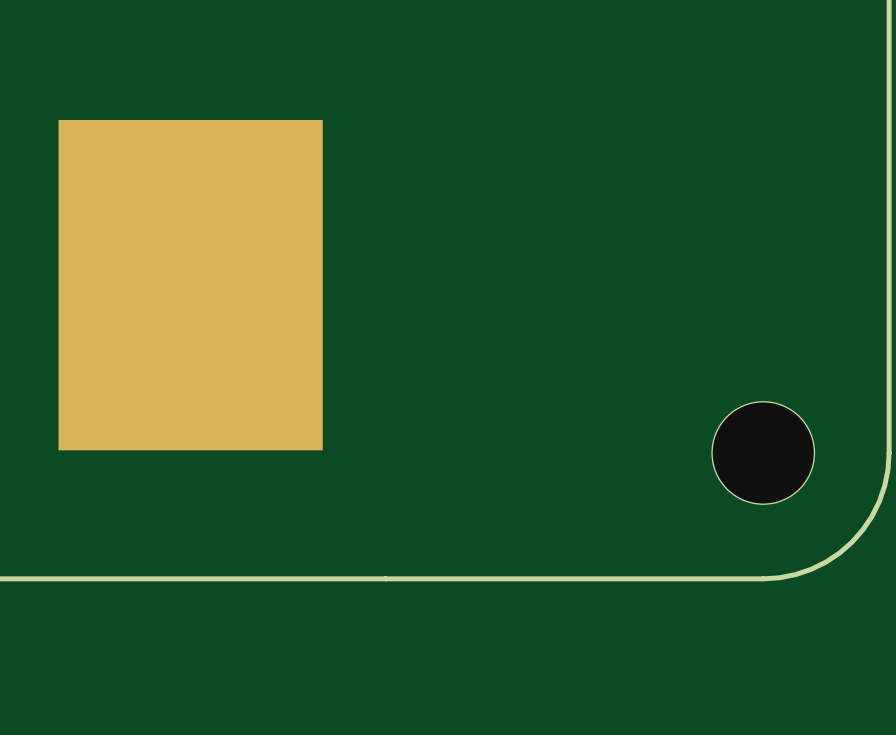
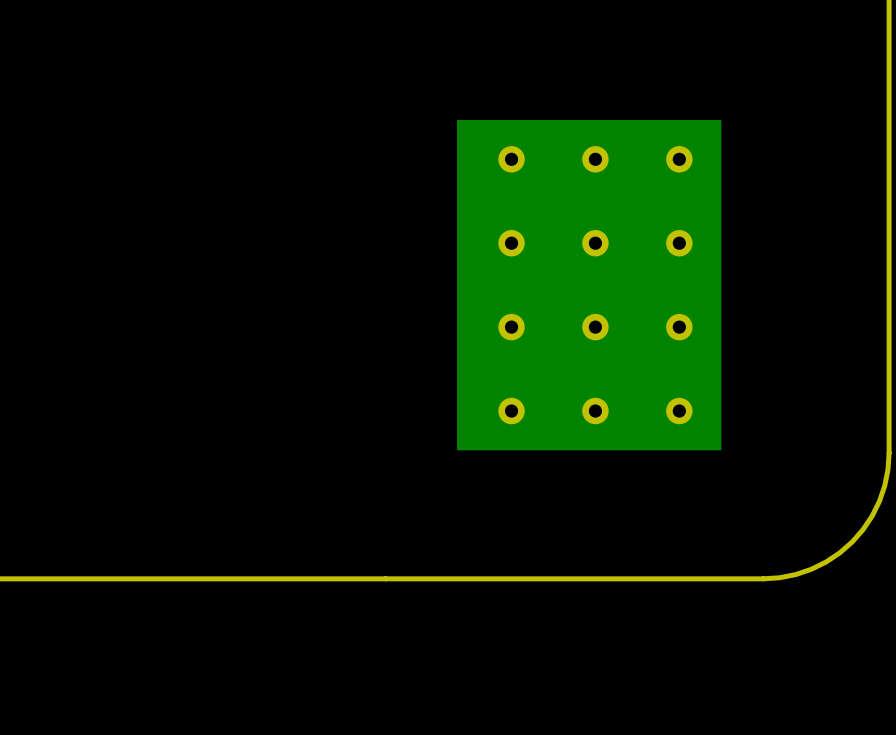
part: (190, 285) -> none
part: none -> (589, 285)
part: (763, 452) -> none

